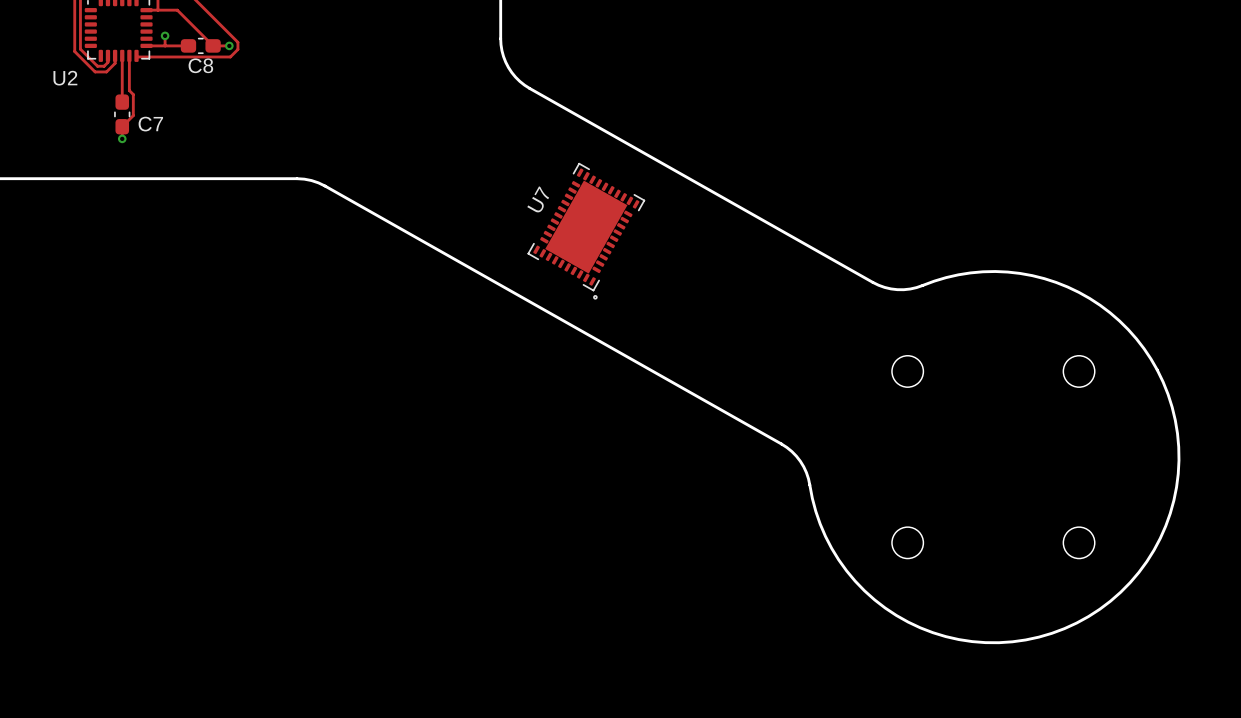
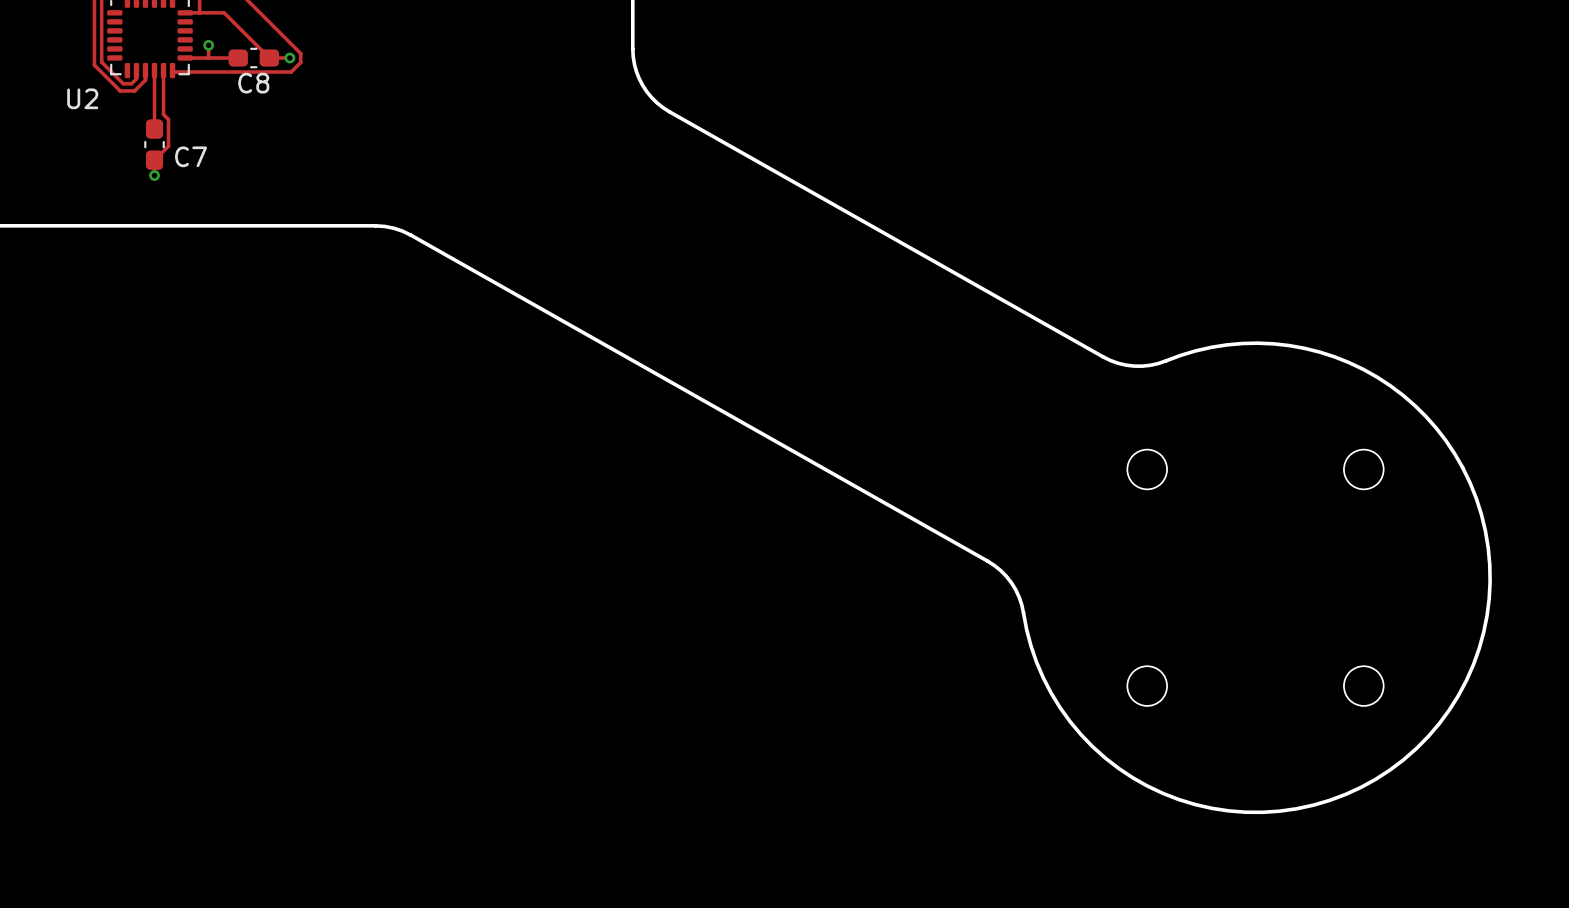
U7: (586, 231) -> none

